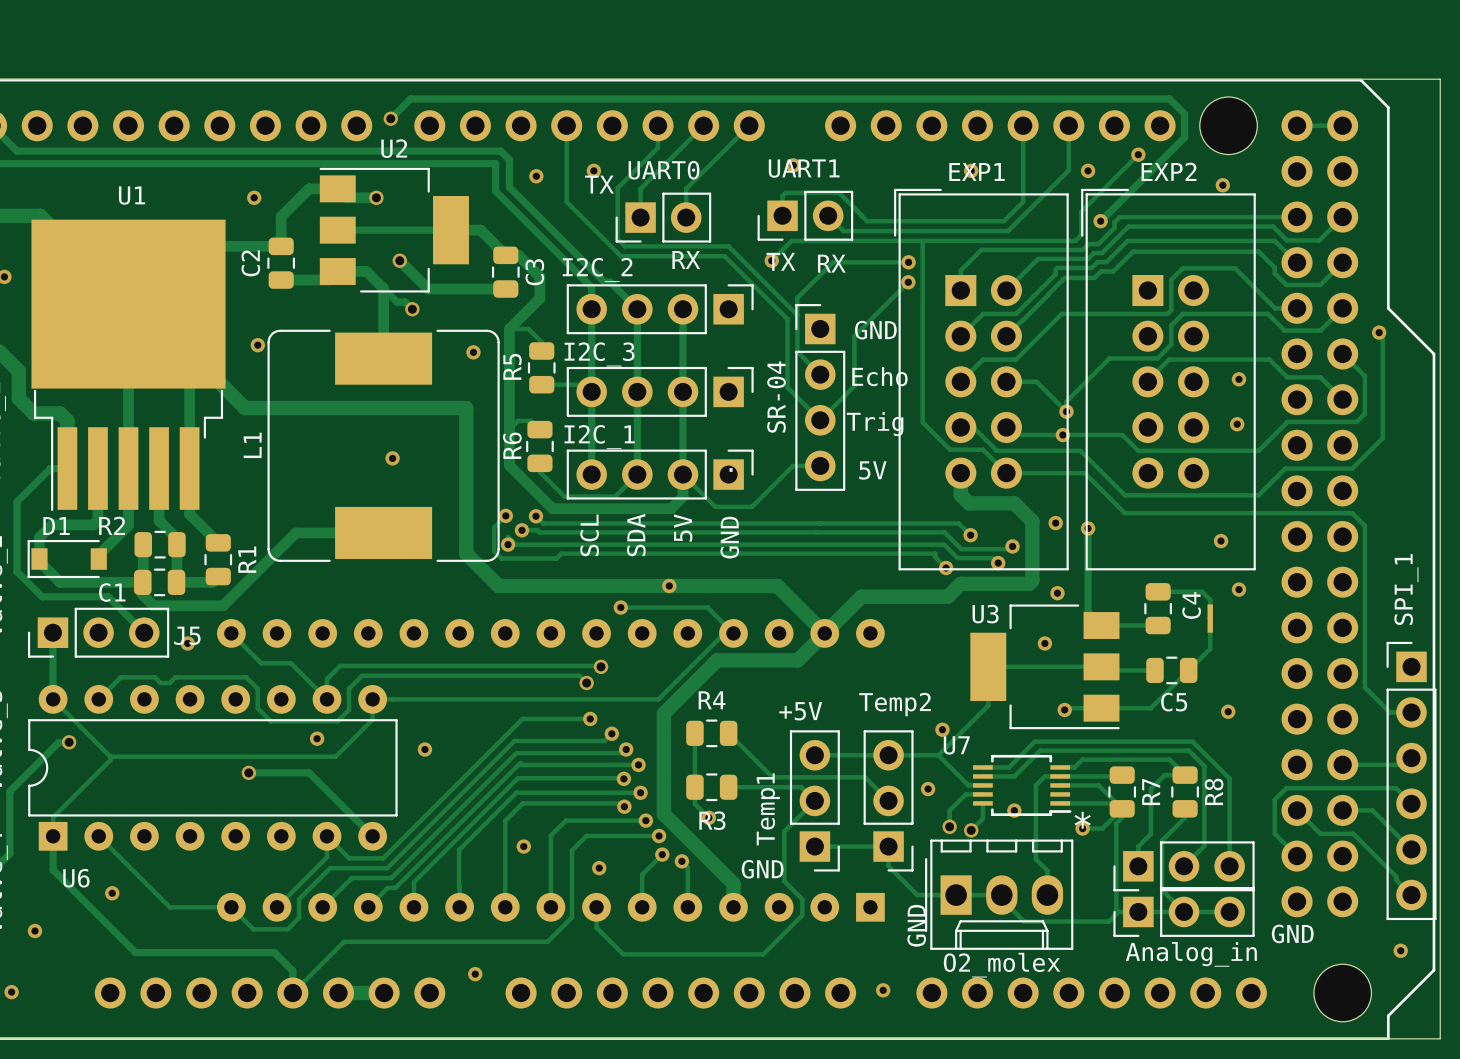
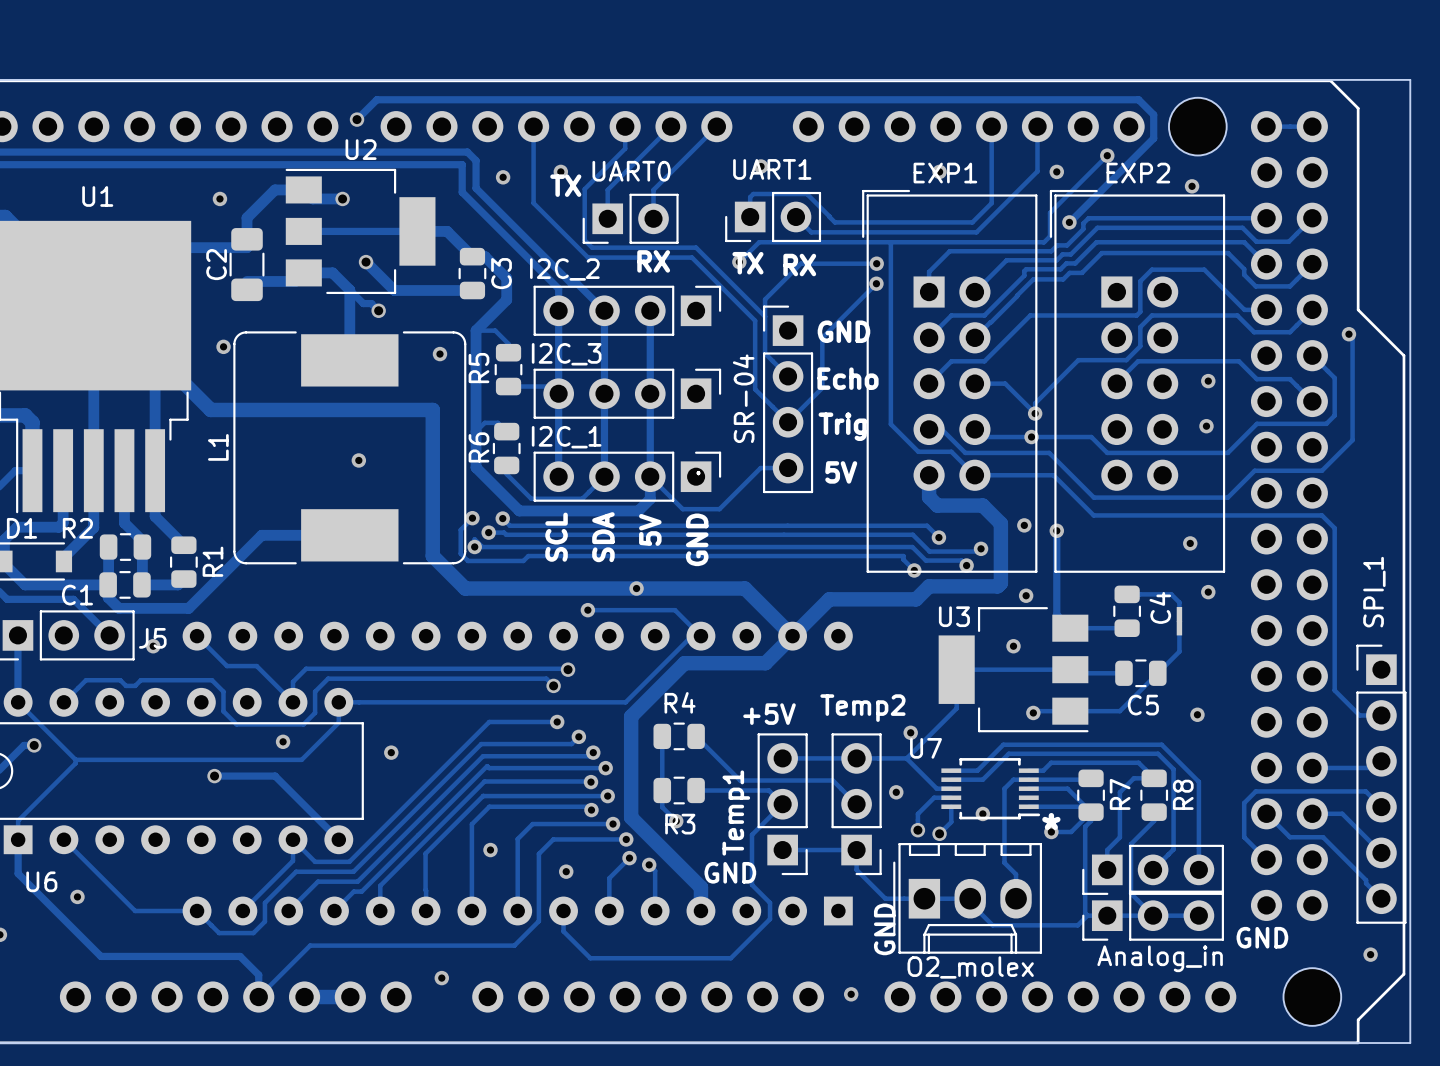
C2 footprint: [267, 237, 296, 289] -> [229, 228, 265, 302]

